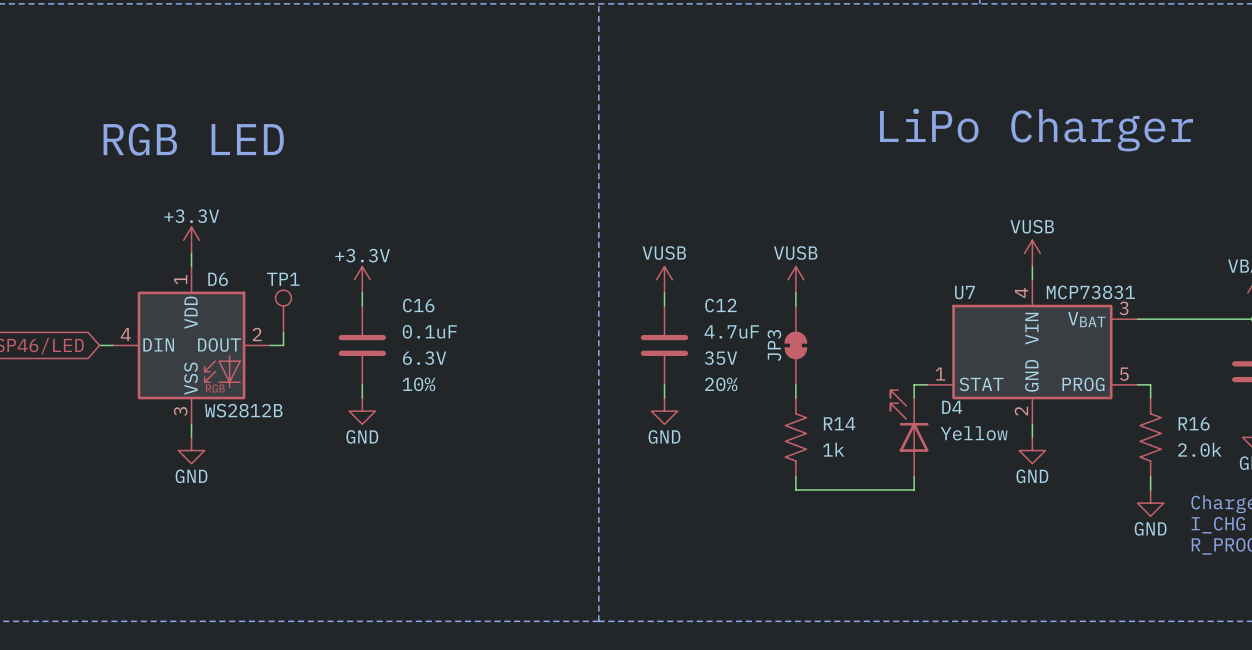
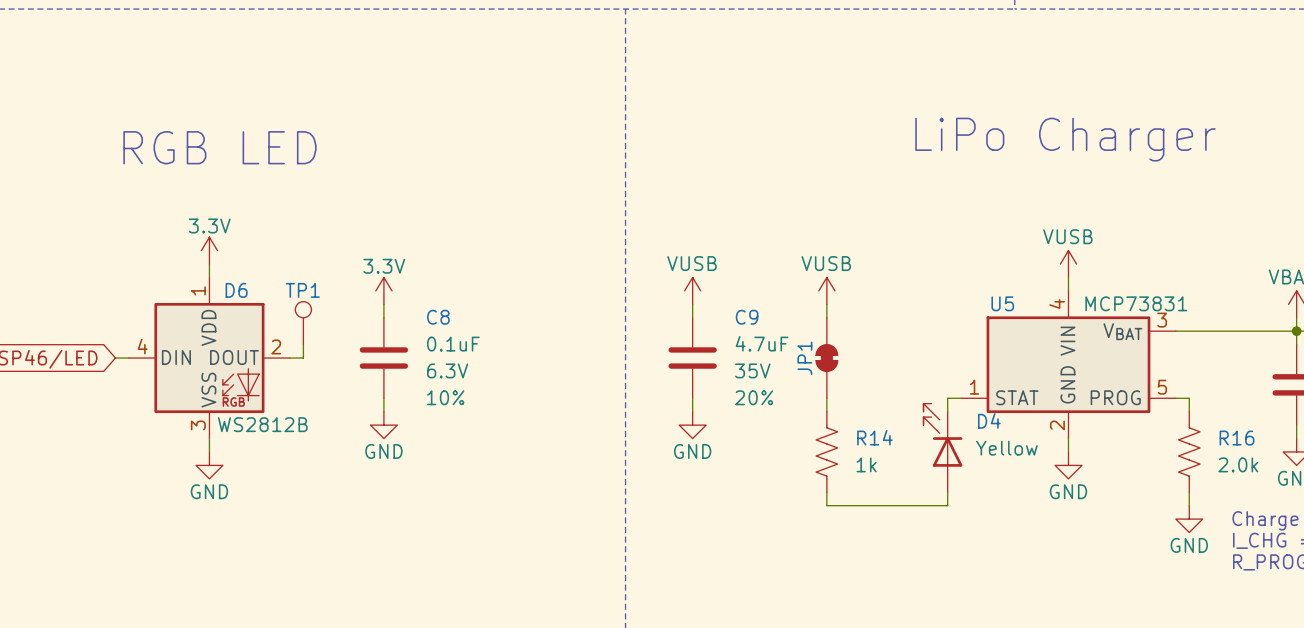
power symbol: +3.3V (191, 240) -> 3.3V (209, 250)
power symbol: +3.3V (362, 279) -> 3.3V (383, 290)
U7 name: U7 (964, 292) -> U5 (1002, 303)
C16 name: C16 (418, 305) -> C8 (438, 317)
C12 name: C12 (720, 305) -> C9 (747, 317)
JP3 name: JP3 (774, 345) -> JP1 (804, 358)

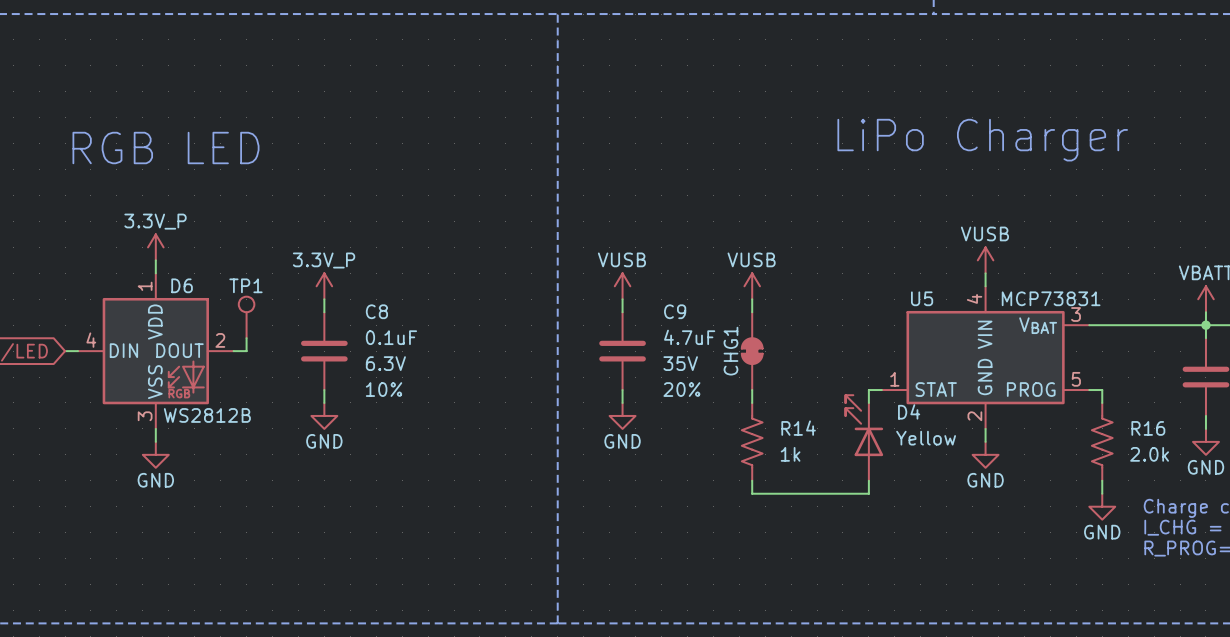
power symbol: 3.3V (209, 250) -> 3.3V_P (155, 247)
power symbol: 3.3V (383, 290) -> 3.3V_P (324, 286)
JP1 name: JP1 (804, 358) -> CHG1 (730, 351)

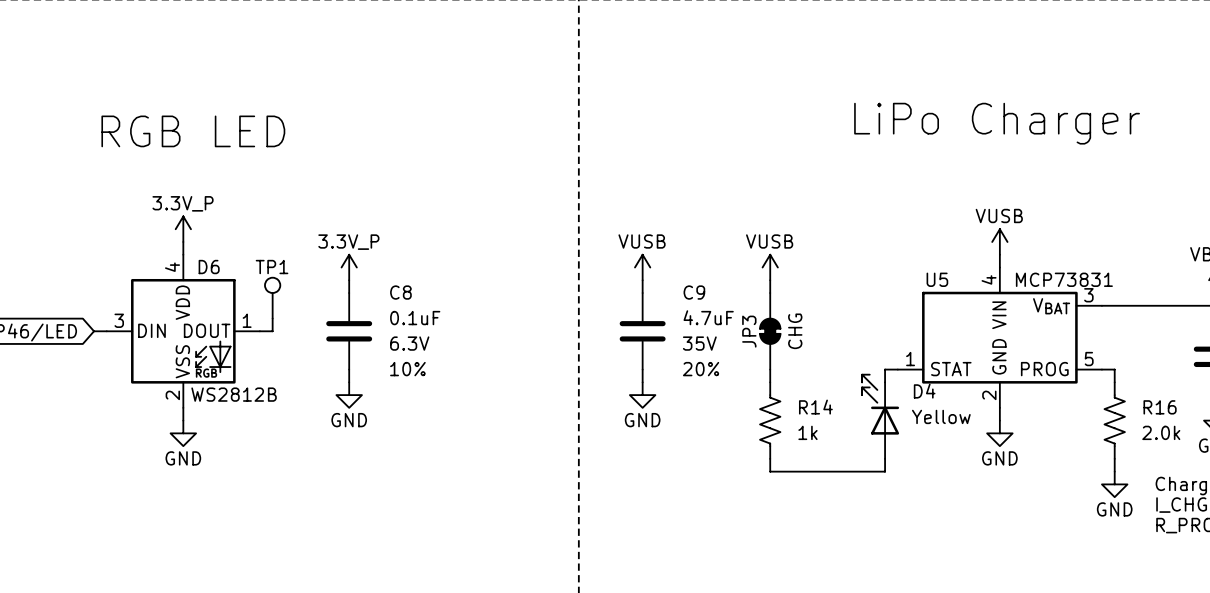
D6 pin number: 1 (145, 286) -> 4 (172, 267)
D6 pin number: 4 (91, 340) -> 3 (119, 320)
D6 pin number: 2 (220, 340) -> 1 (247, 320)
CHG1 name: CHG1 (730, 351) -> JP3 (749, 331)
CHG1 value: none -> CHG (795, 331)
D6 pin number: 3 (145, 416) -> 2 (172, 395)

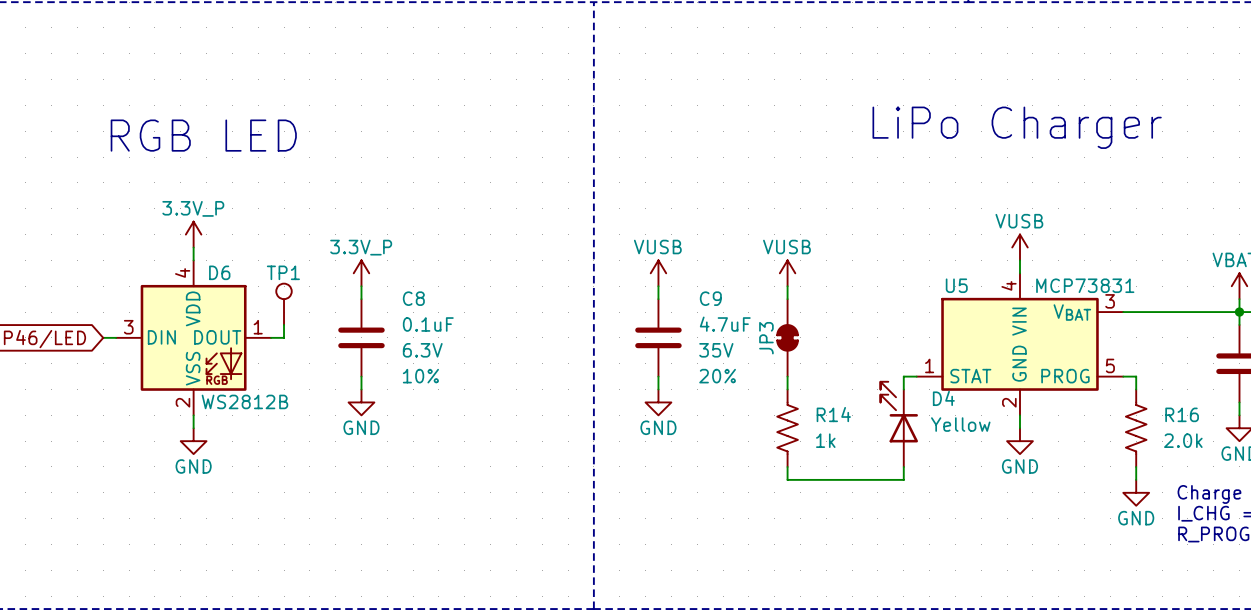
JP3 value: CHG (795, 331) -> none

